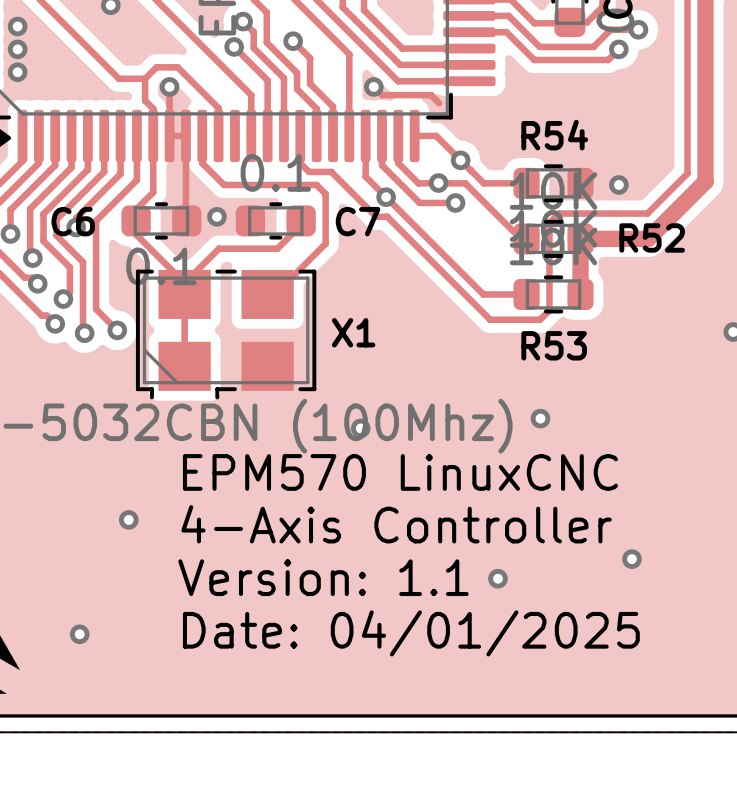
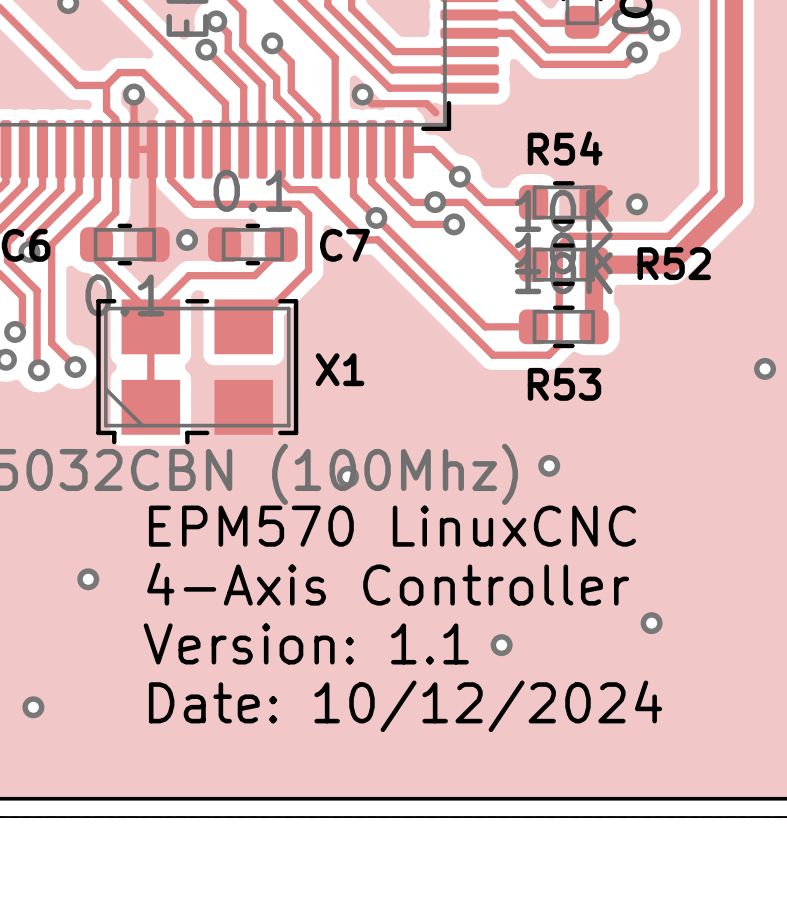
text: Date: 04/01/2025 (411, 633) -> Date: 10/12/2024 (405, 706)

